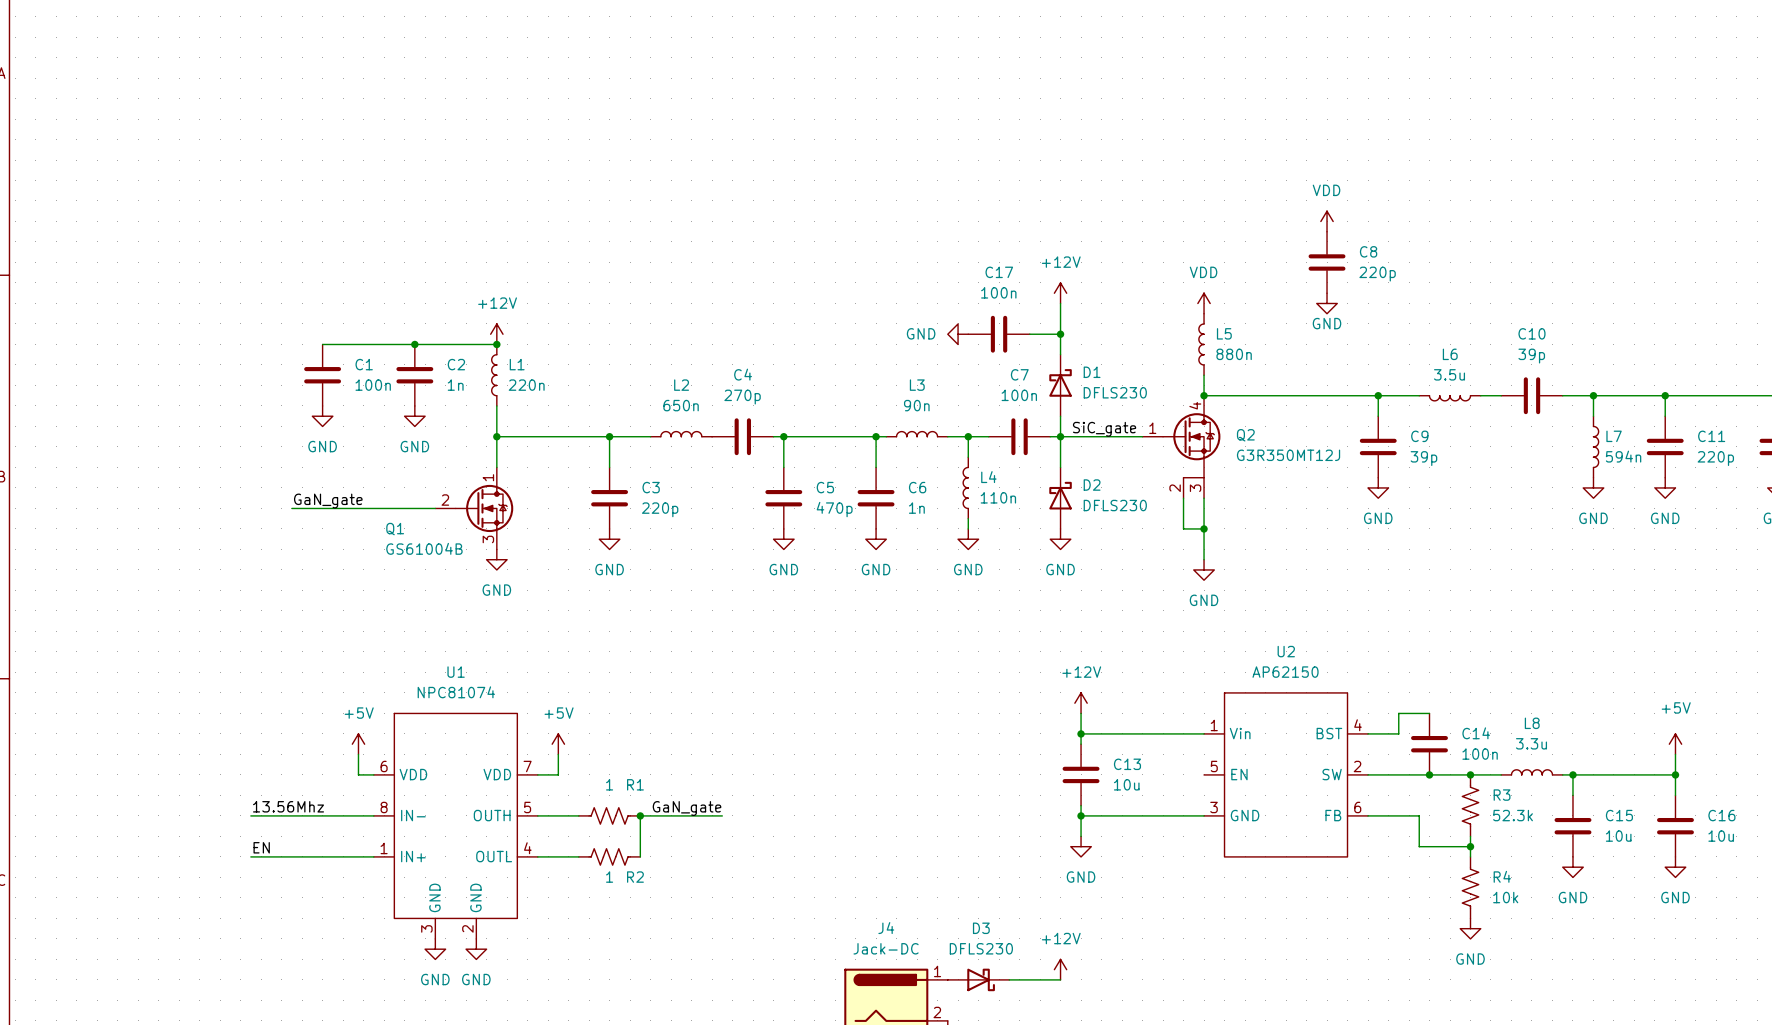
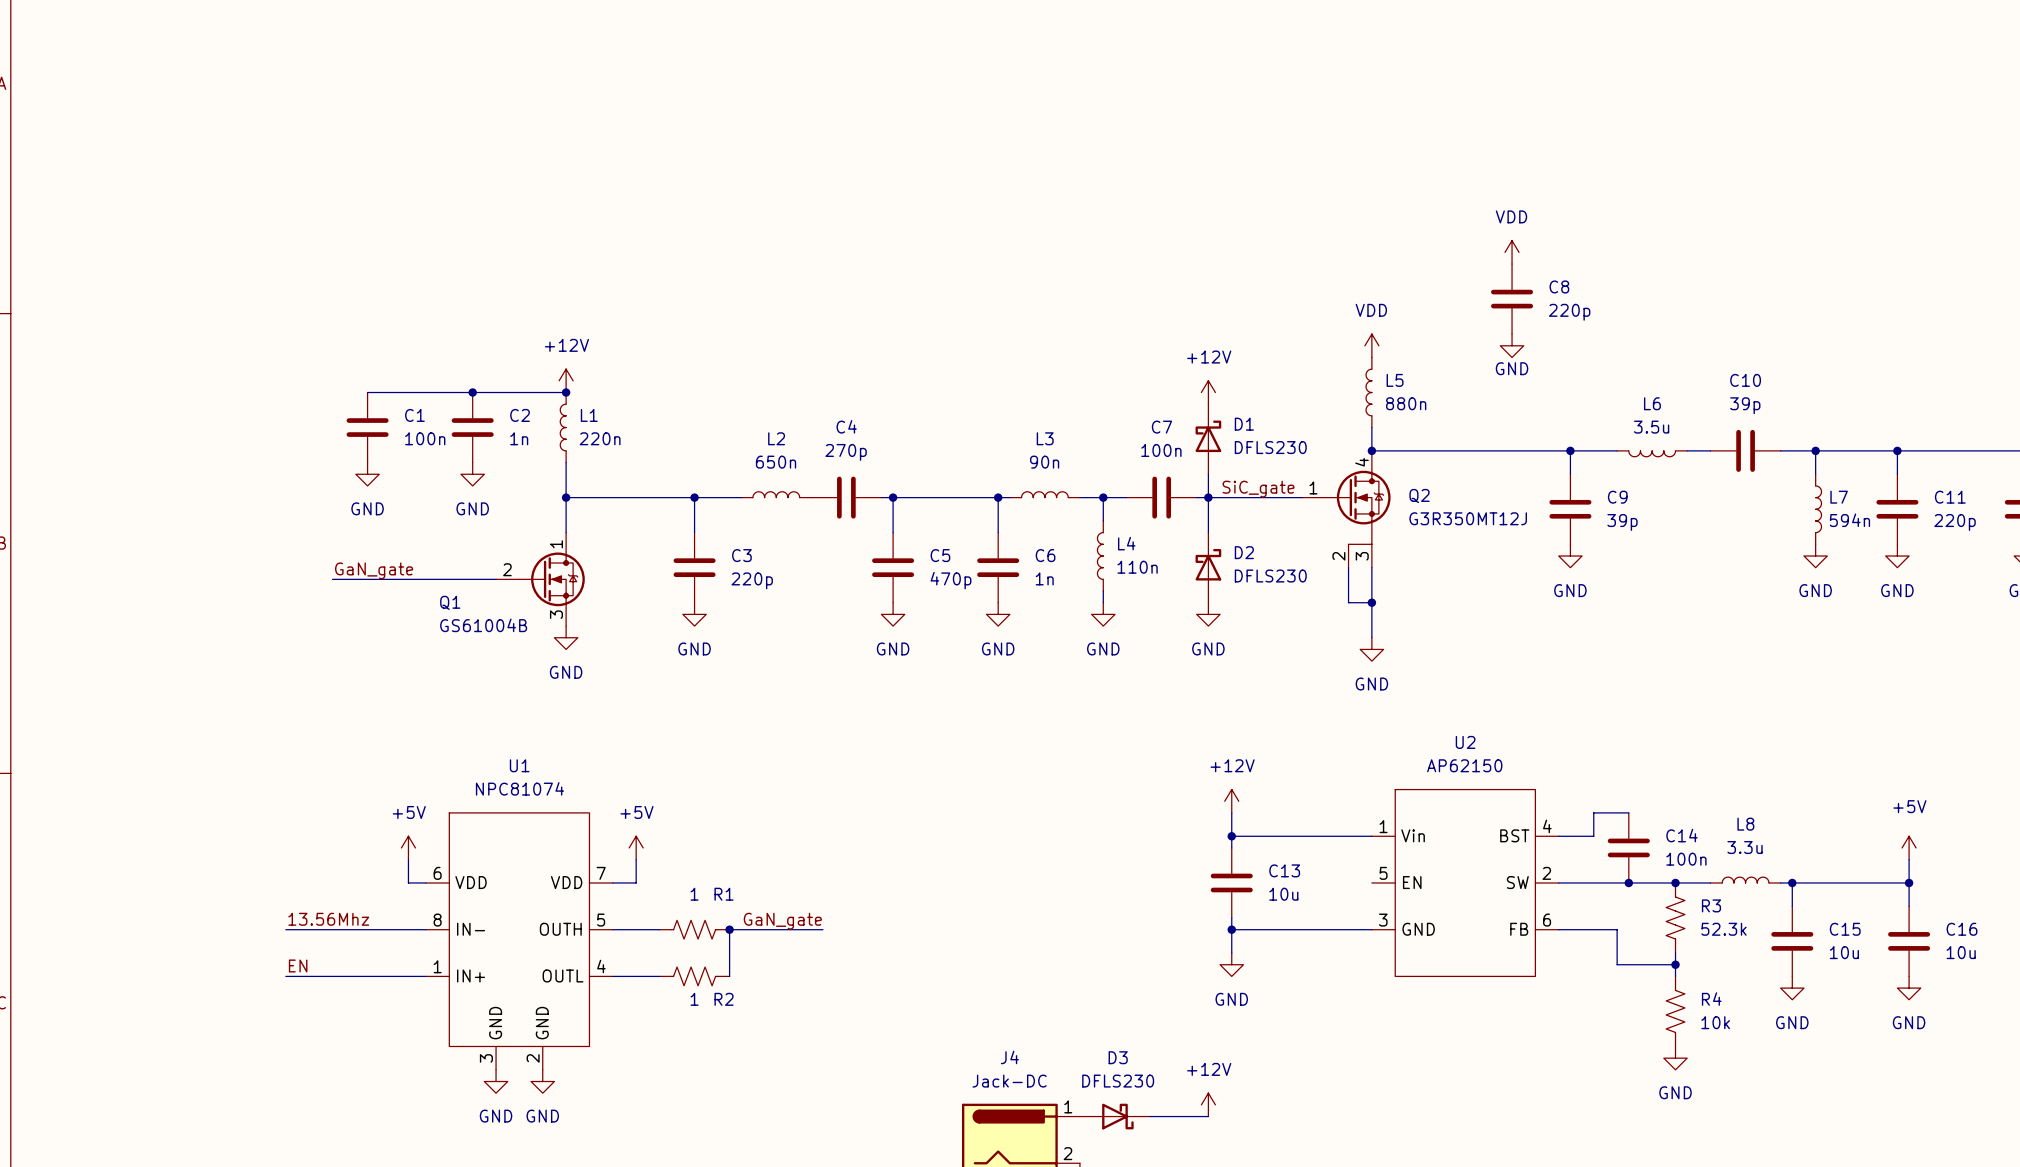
power symbol position: +12V (1060, 293) -> +12V (1208, 392)
wire: (1060, 303) (1060, 354) -> none
power symbol: GND (958, 334) -> none
C17: 100n (999, 334) -> none
wire: (1029, 334) (1060, 334) -> none
junction: (1060, 334) -> none

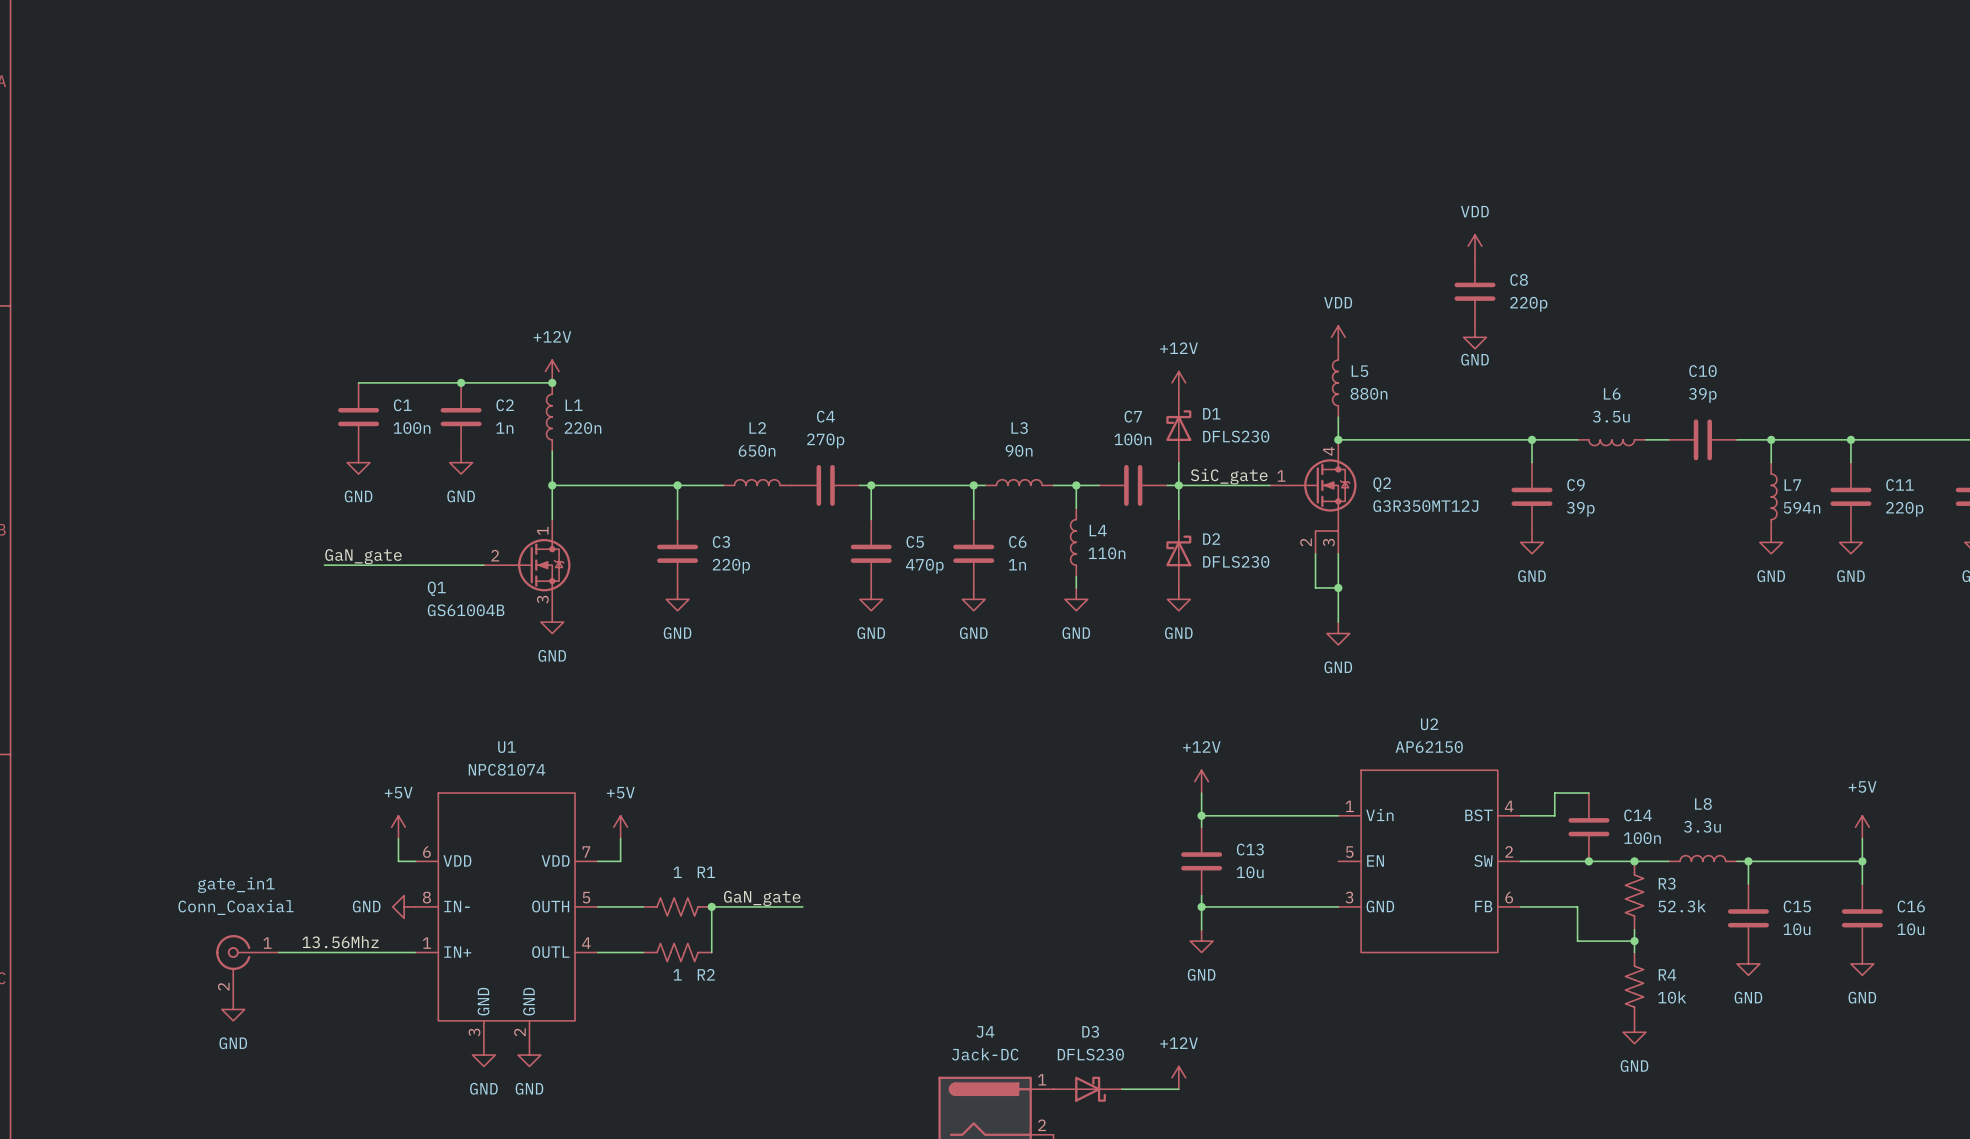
label position: 13.56Mhz (328, 919) -> 13.56Mhz (340, 942)
wire: (285, 929) (425, 929) -> none
power symbol: none -> GND (404, 906)
label: EN (298, 965) -> none
gate_in1: none -> Conn_Coaxial (247, 966)
power symbol: none -> GND (233, 1009)

